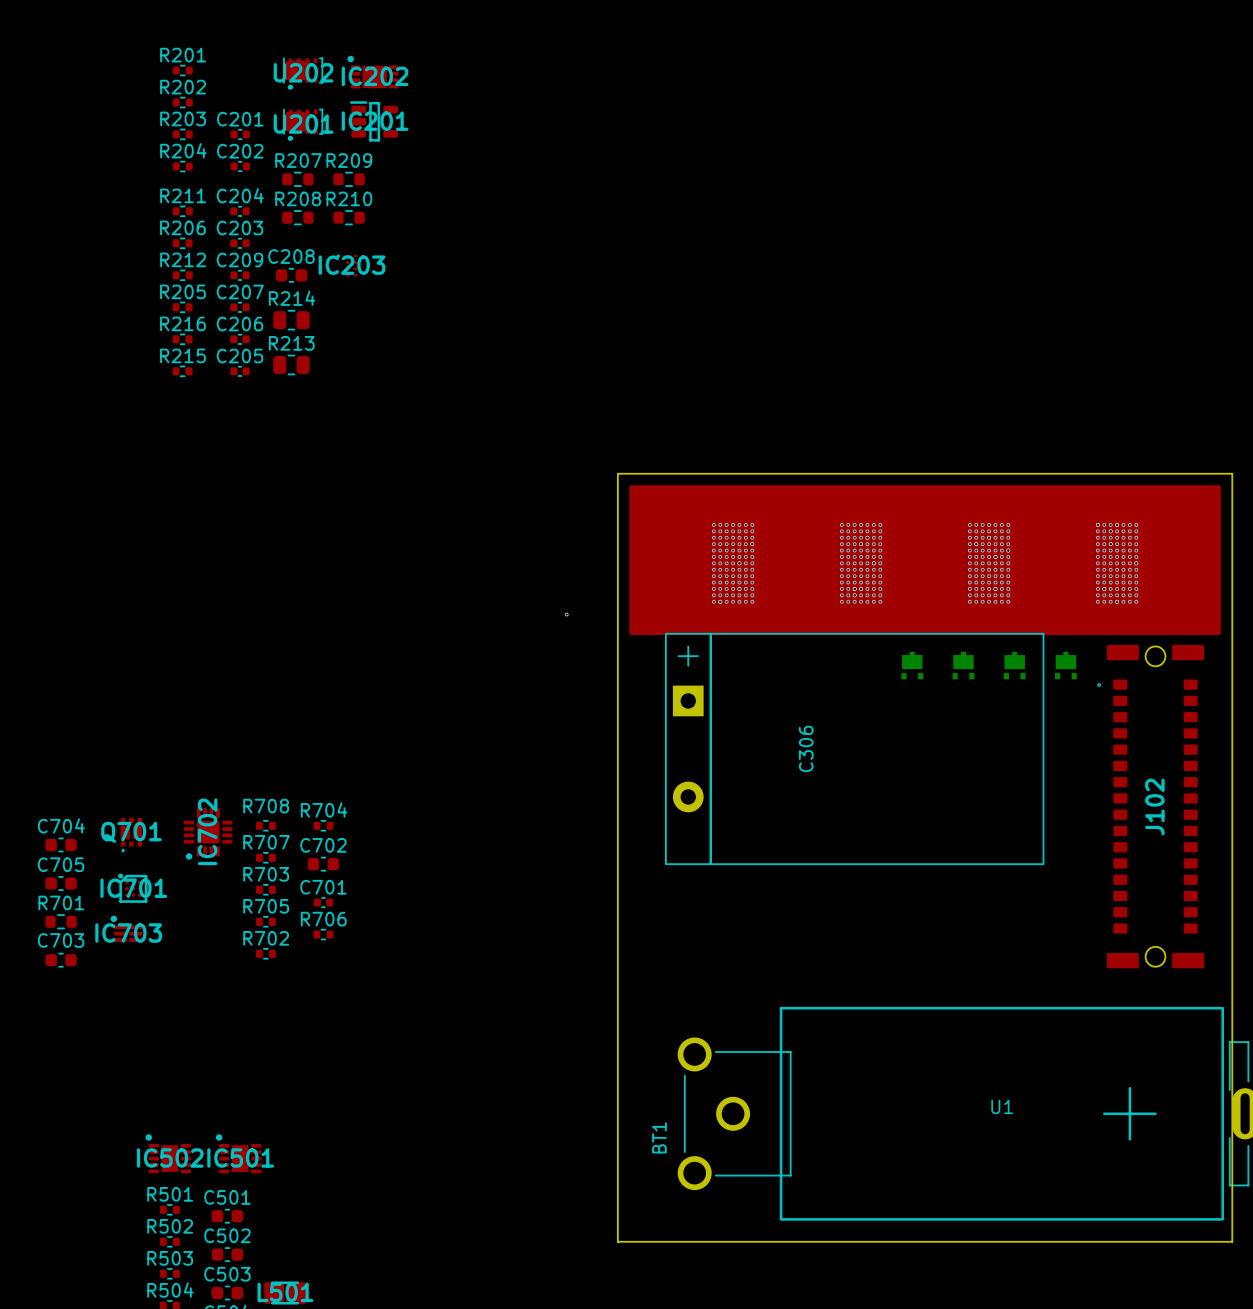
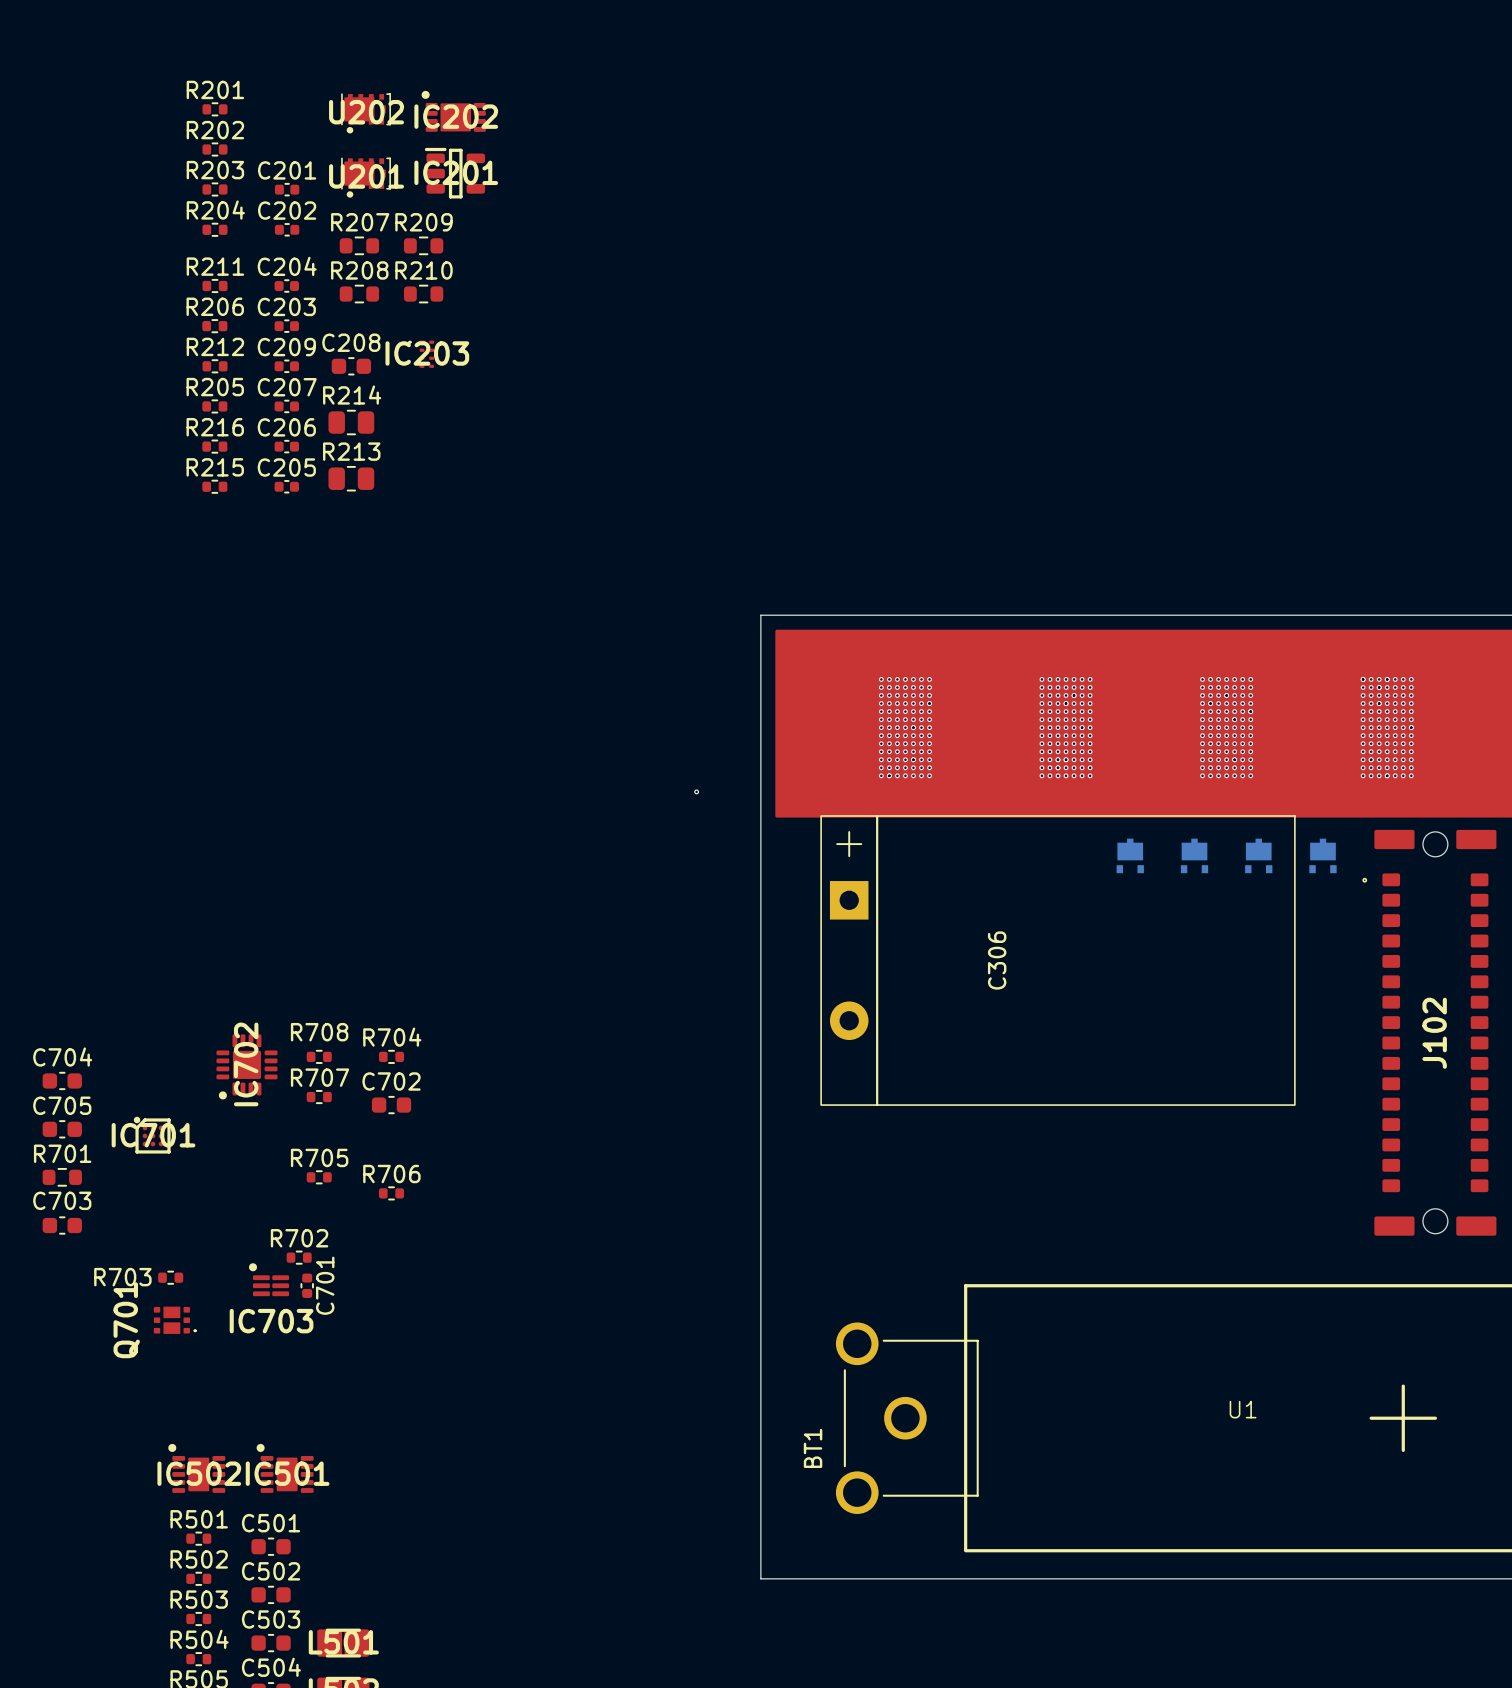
Q701 name position: Q701 (131, 832) -> Q701 (126, 1320)
Q701 rotation: 0° (131, 834) -> 90° counterclockwise (175, 1320)
Q701 position: (131, 834) -> (175, 1320)
R703 name position: R703 (266, 874) -> R703 (122, 1277)
R703 position: (265, 889) -> (170, 1277)
C701 rotation: 0° (323, 902) -> 90° clockwise (307, 1285)
C701 position: (323, 902) -> (307, 1285)
IC703 position: (126, 928) -> (269, 1279)
IC703 name position: IC703 (128, 933) -> IC703 (271, 1321)
R702 position: (265, 953) -> (299, 1257)

